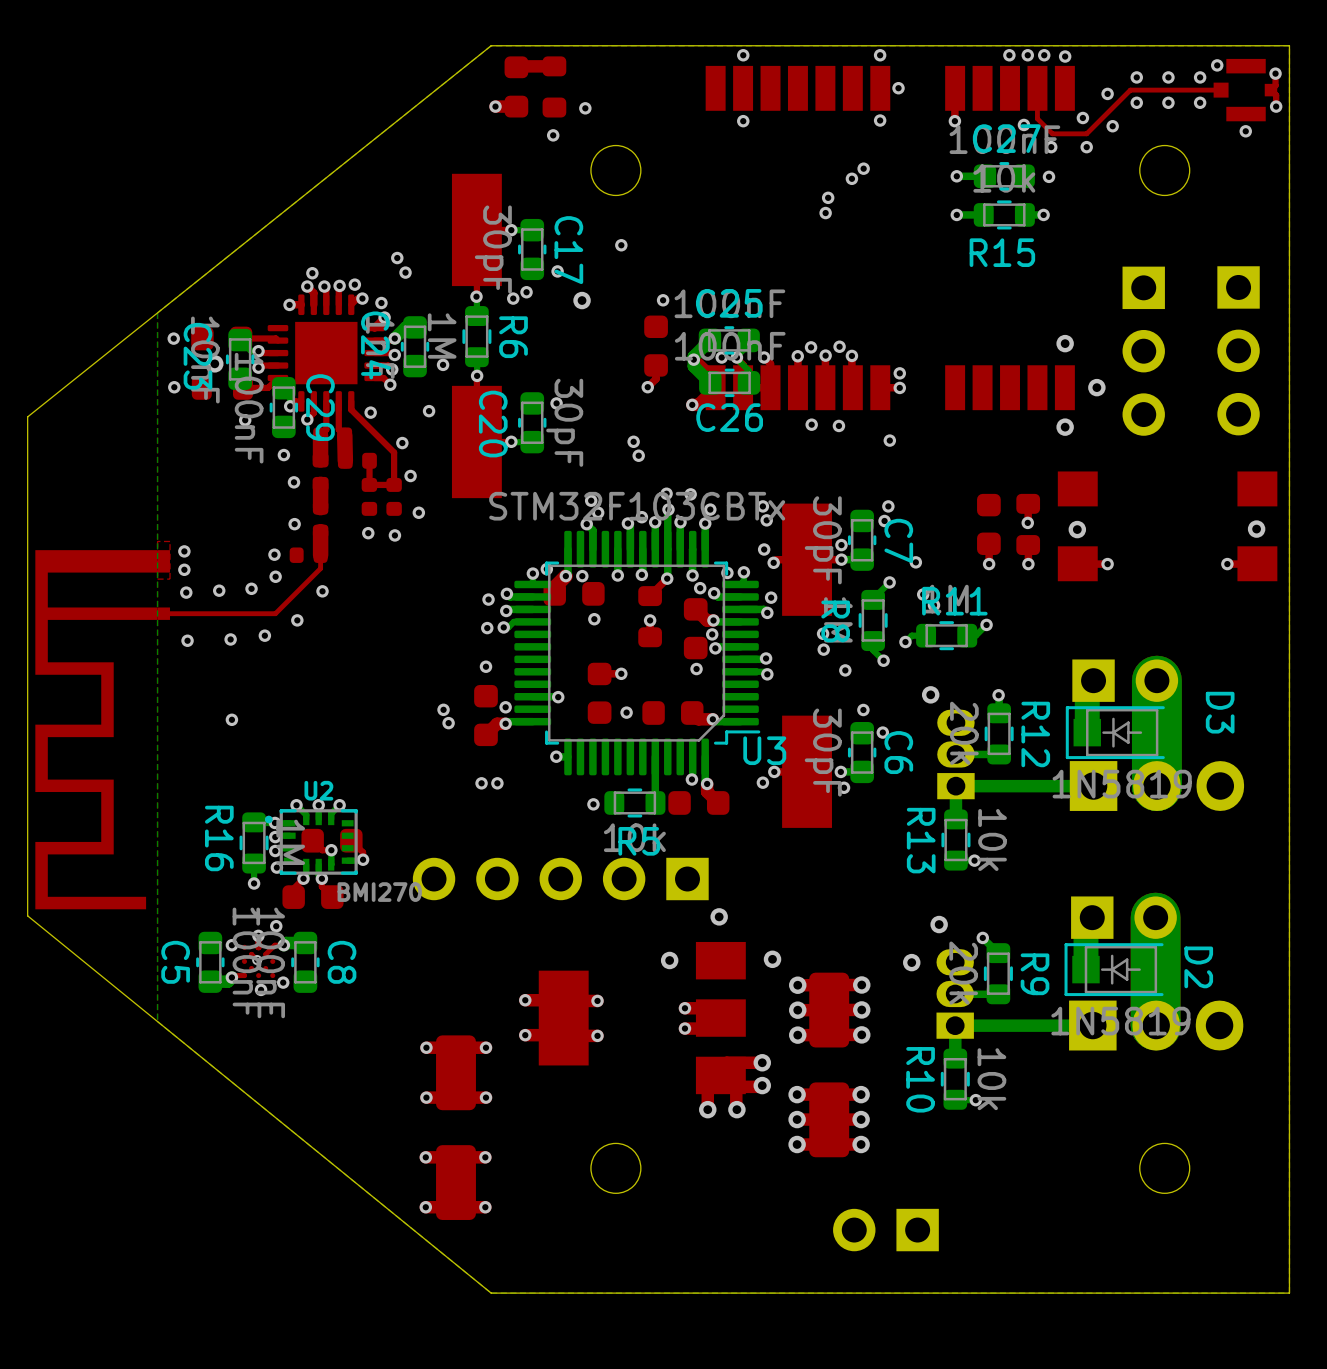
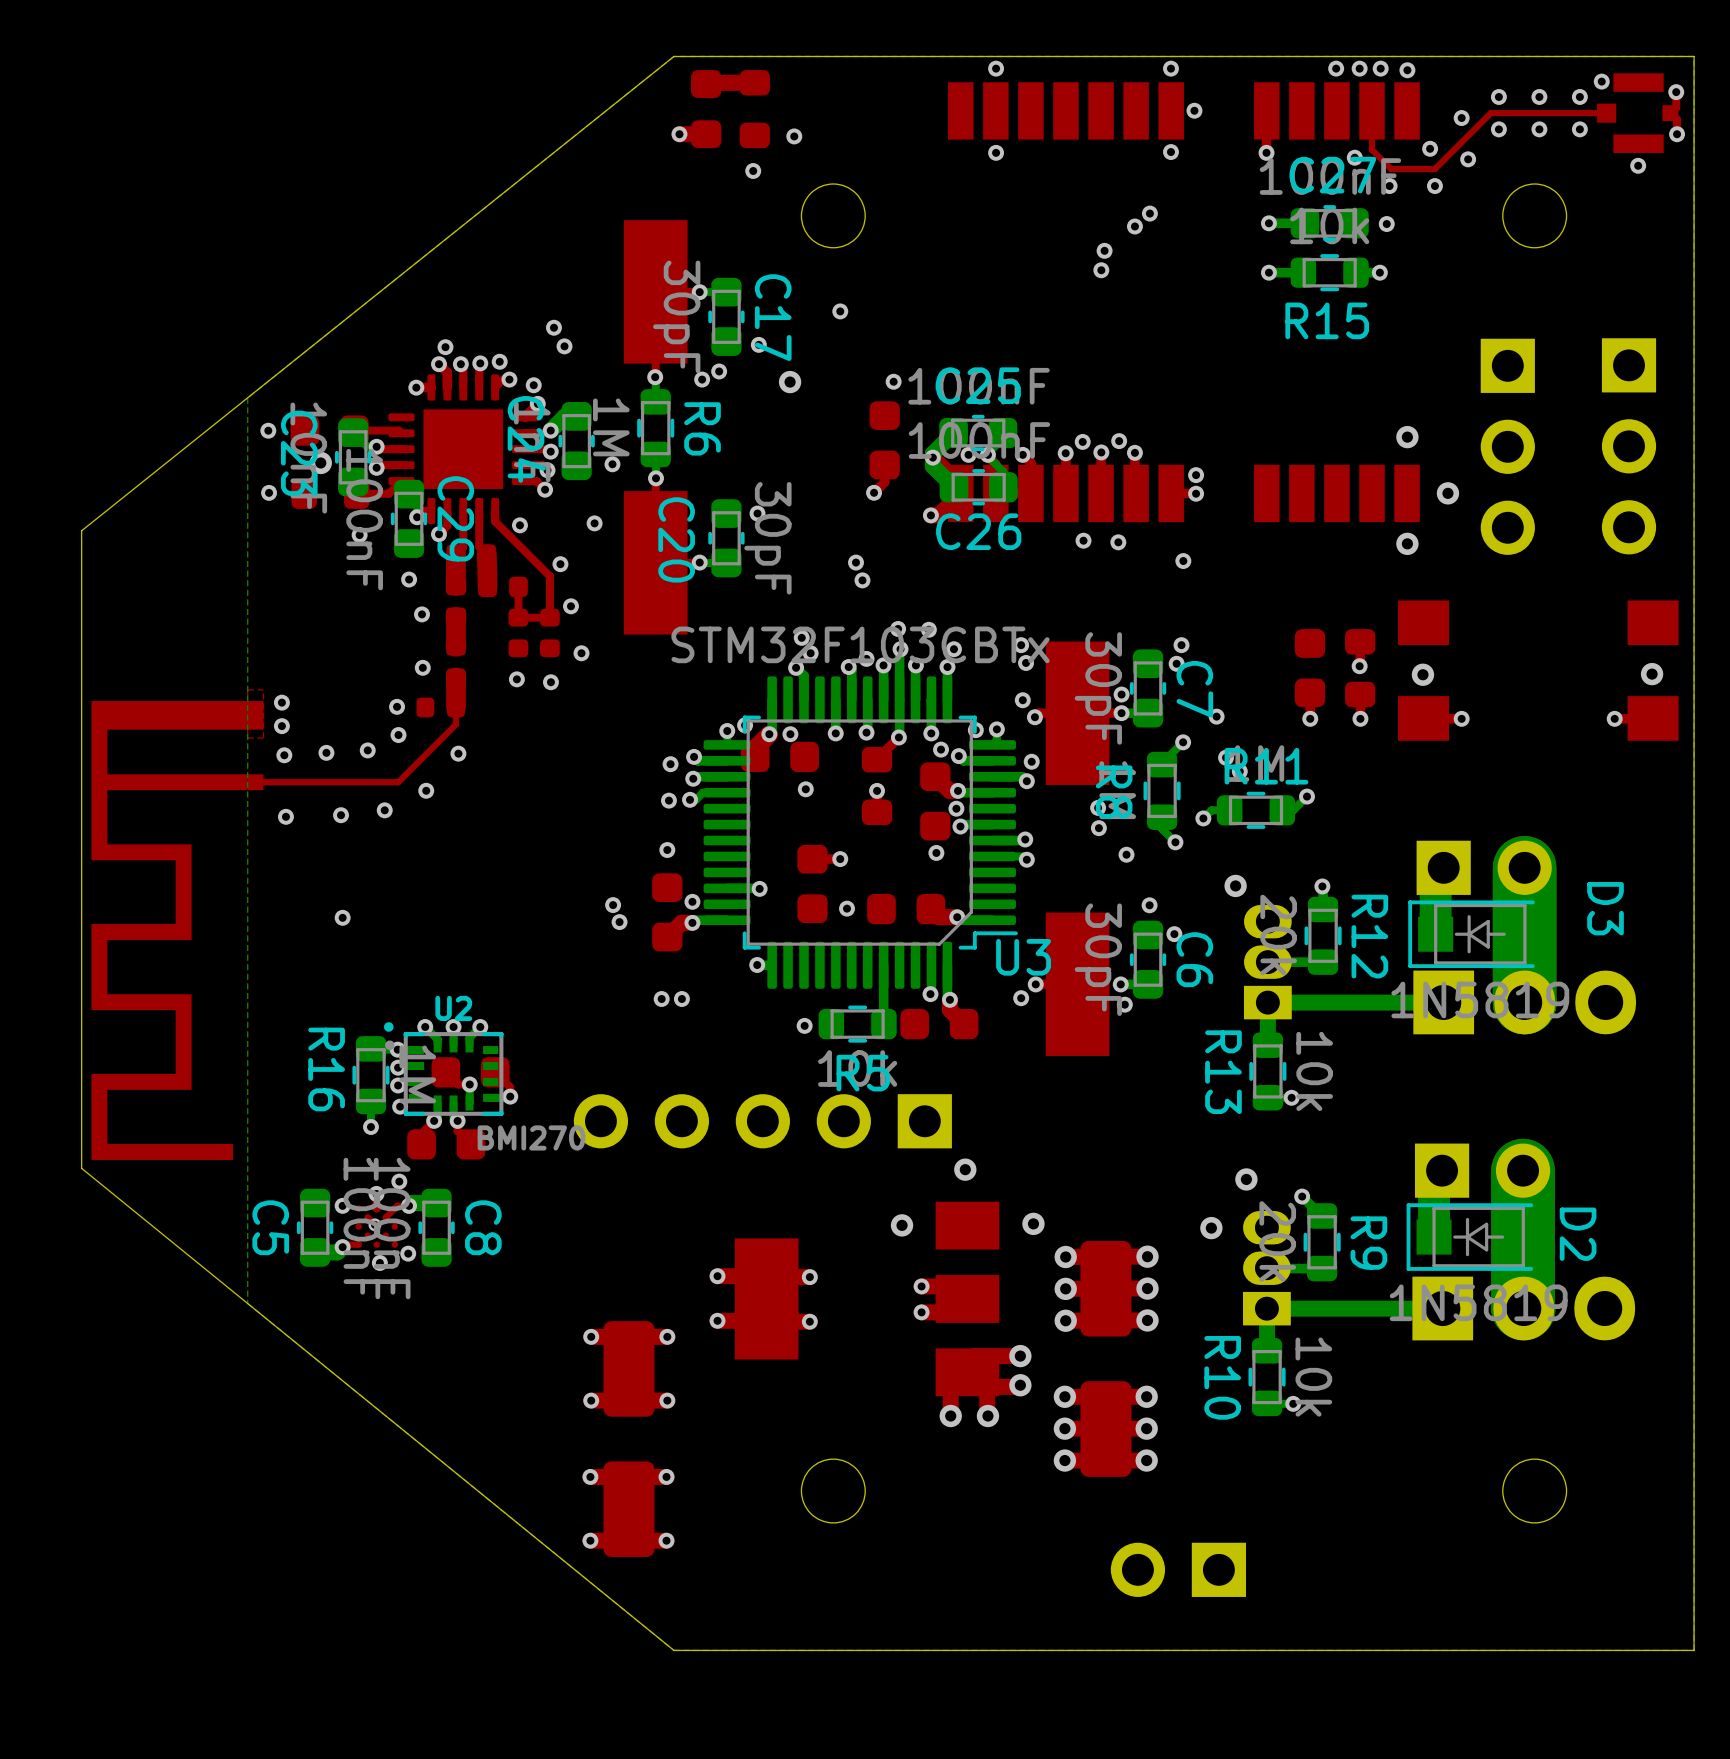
U2 footprint: [265, 809, 358, 875] -> [384, 1022, 504, 1116]

